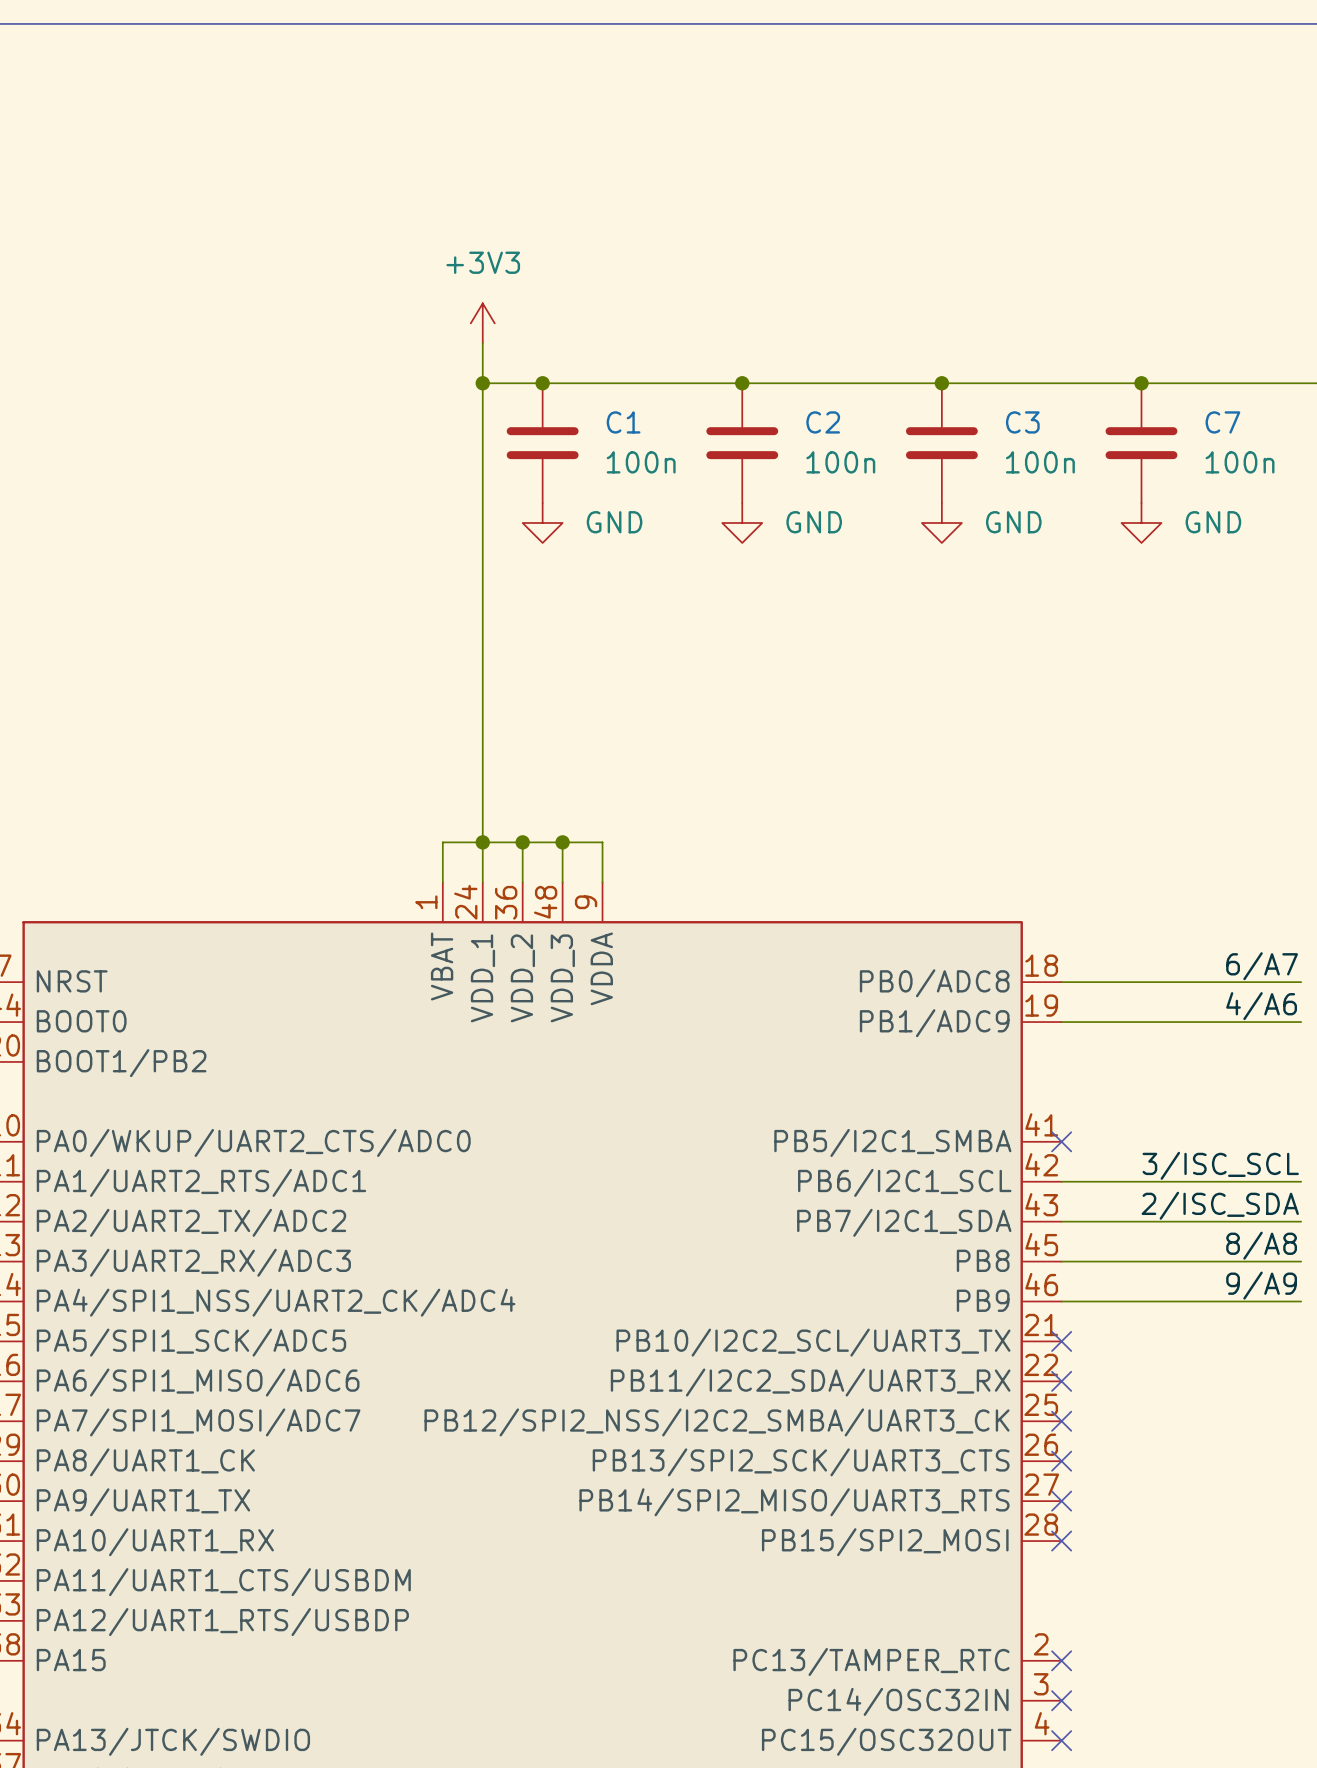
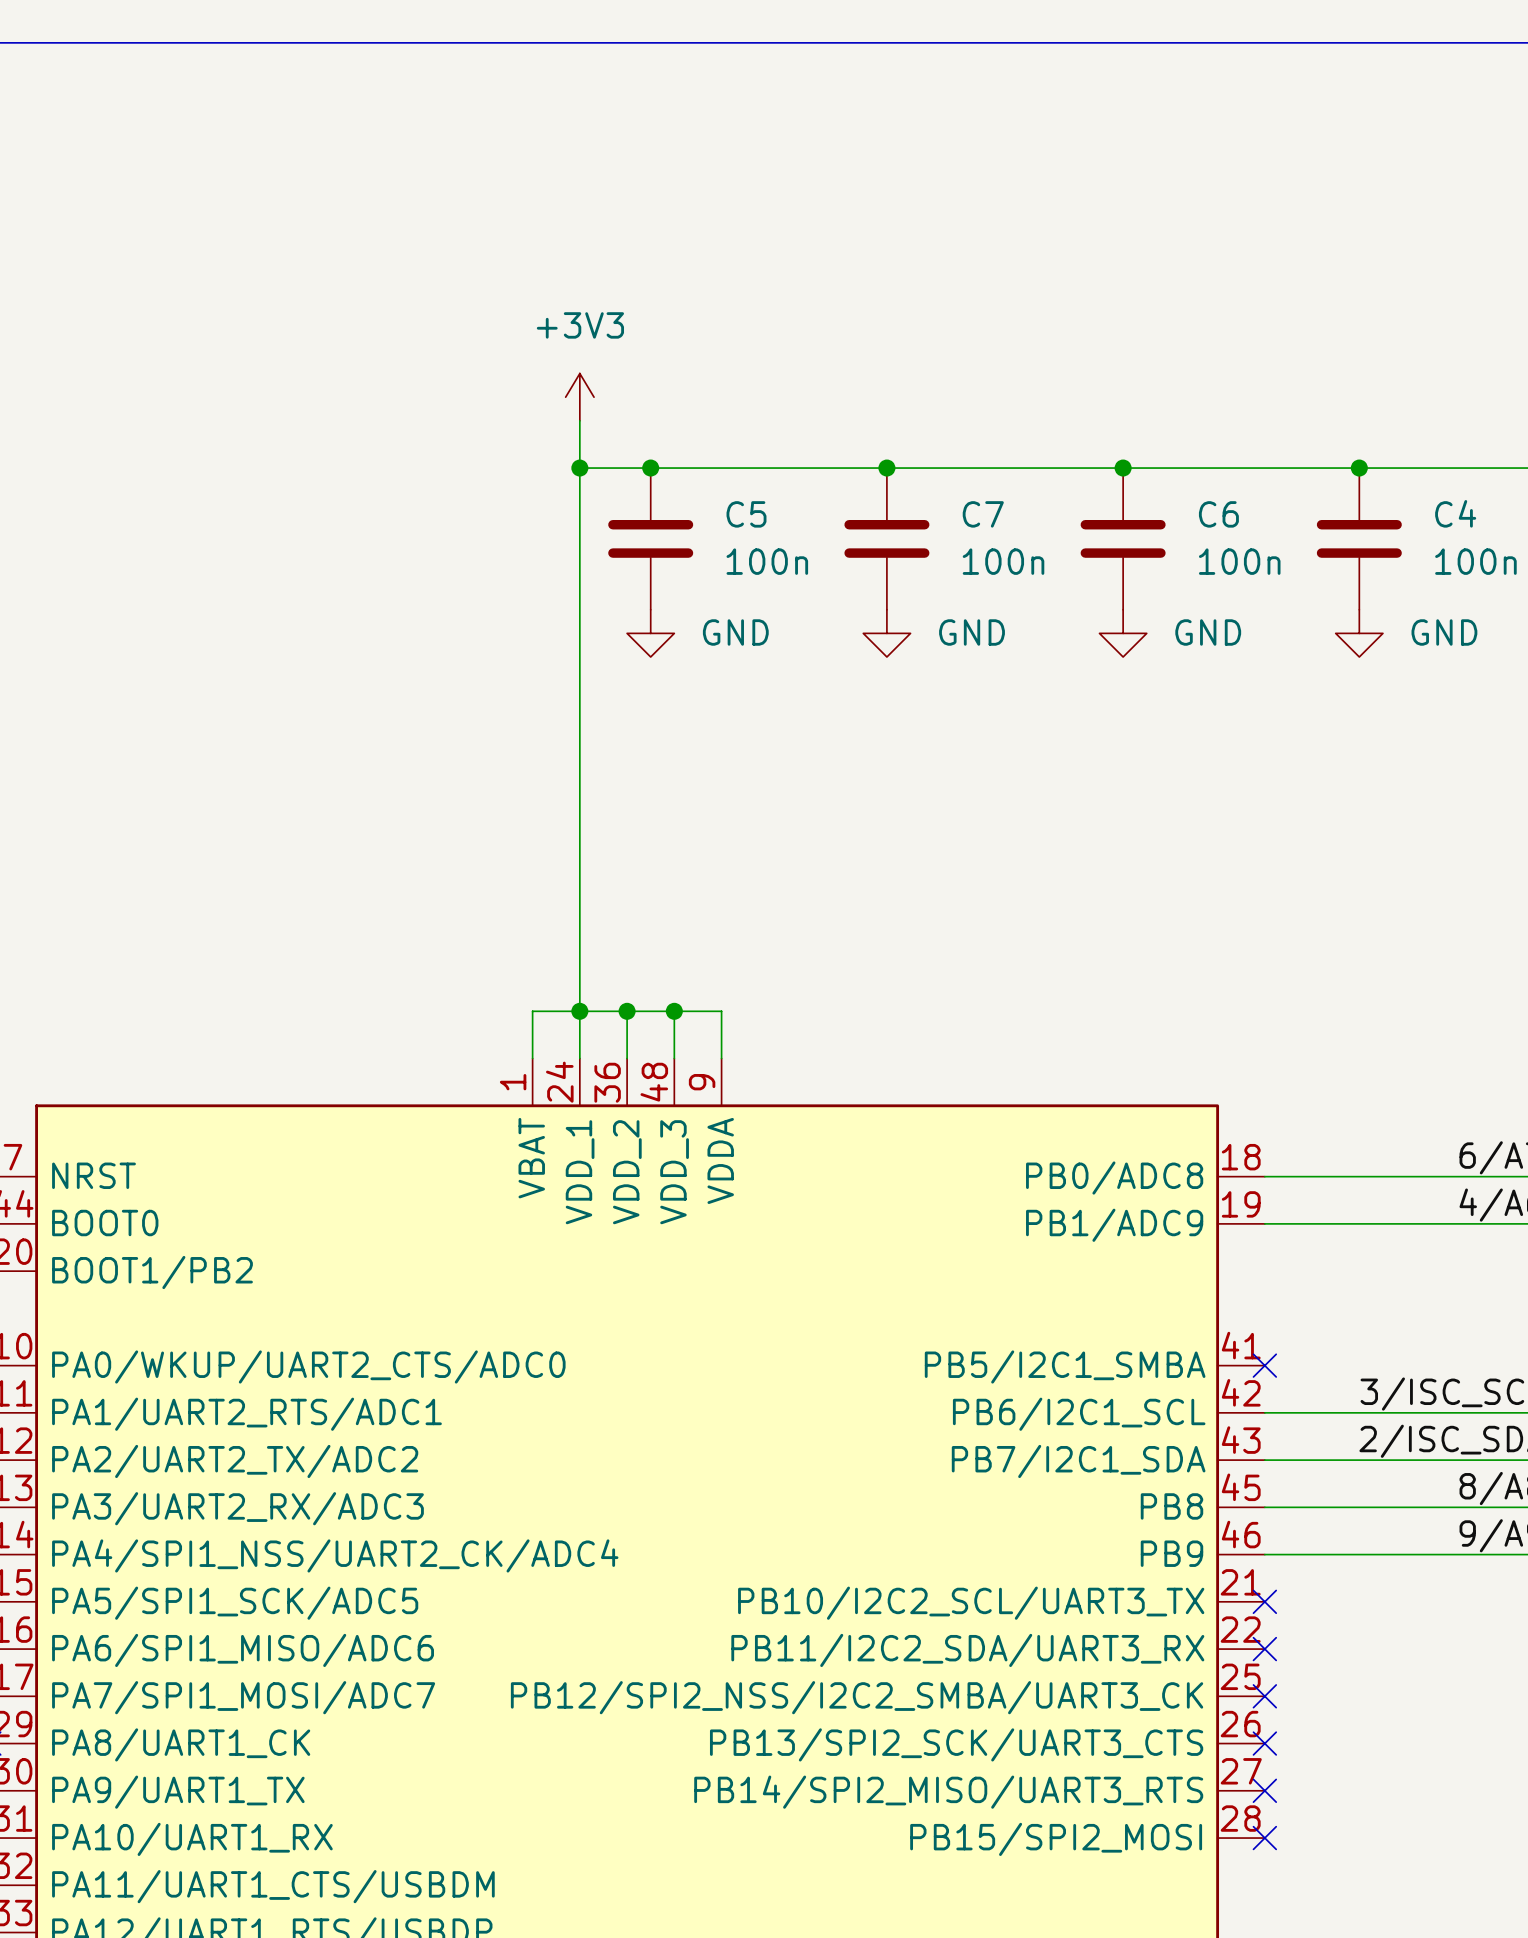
C1 name: C1 (623, 422) -> C5 (746, 514)
C2 name: C2 (823, 422) -> C7 (983, 514)
C3 name: C3 (1022, 422) -> C6 (1218, 514)
C7 name: C7 (1222, 422) -> C4 (1455, 513)

